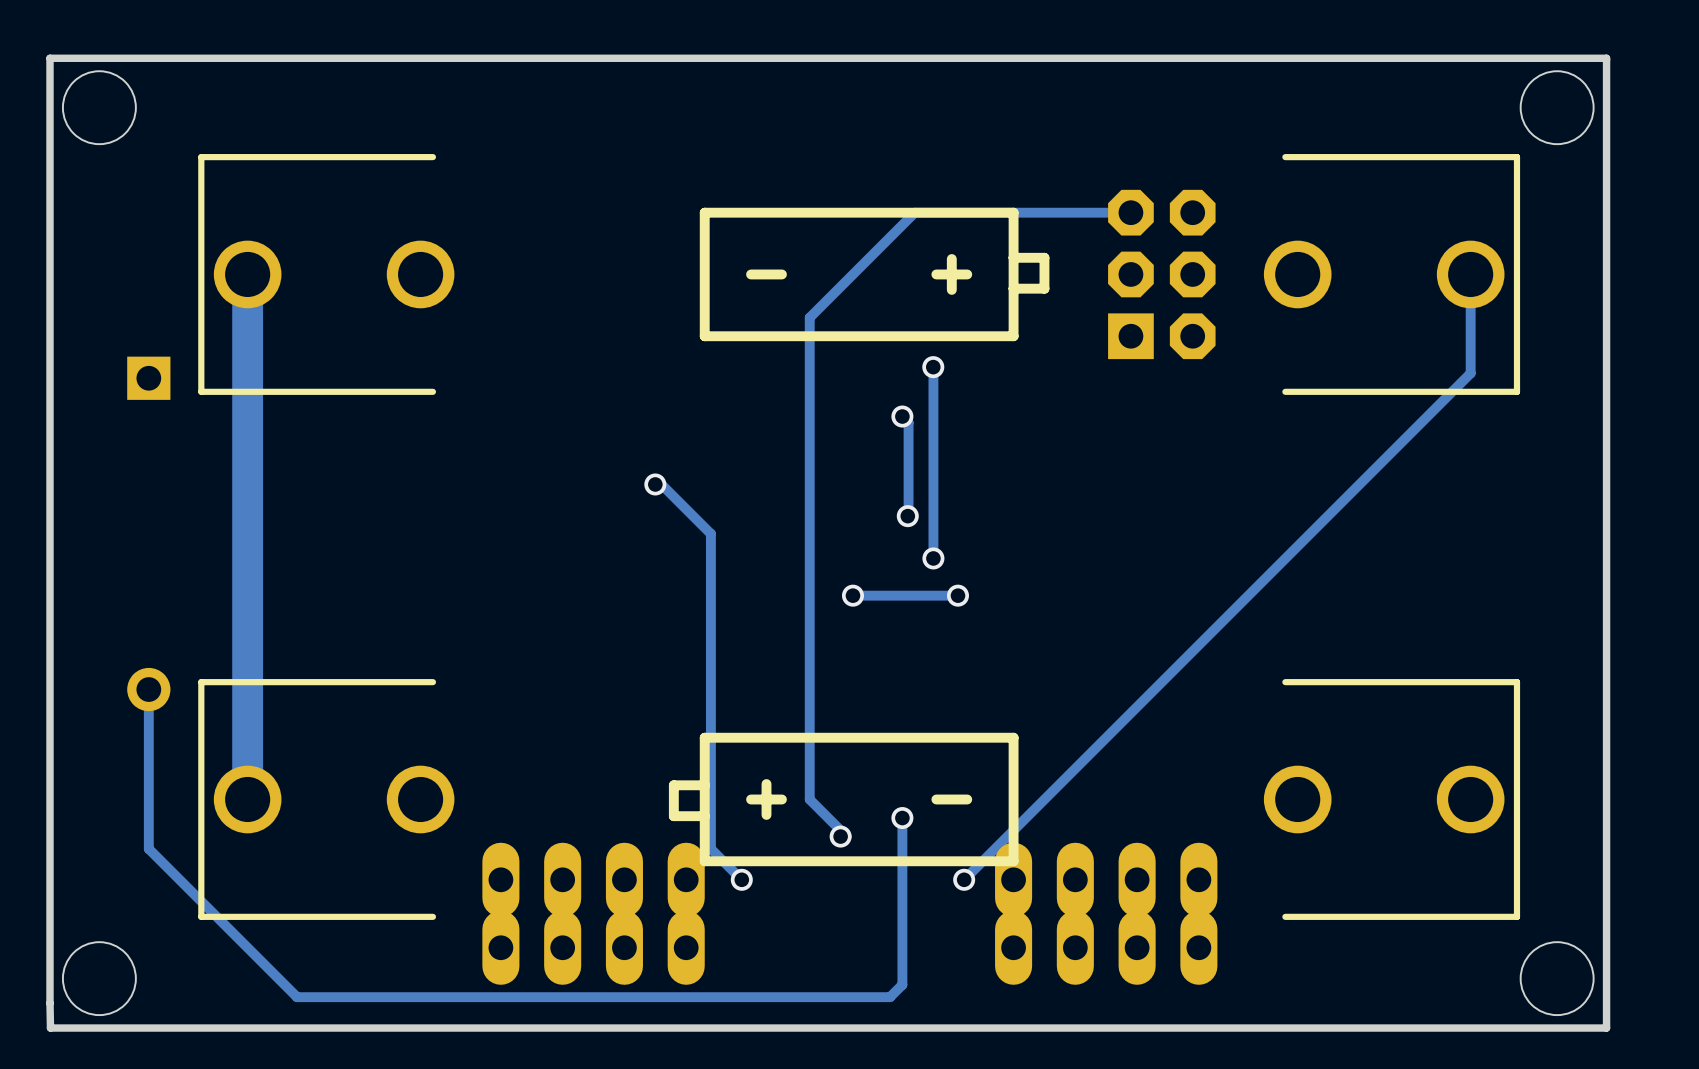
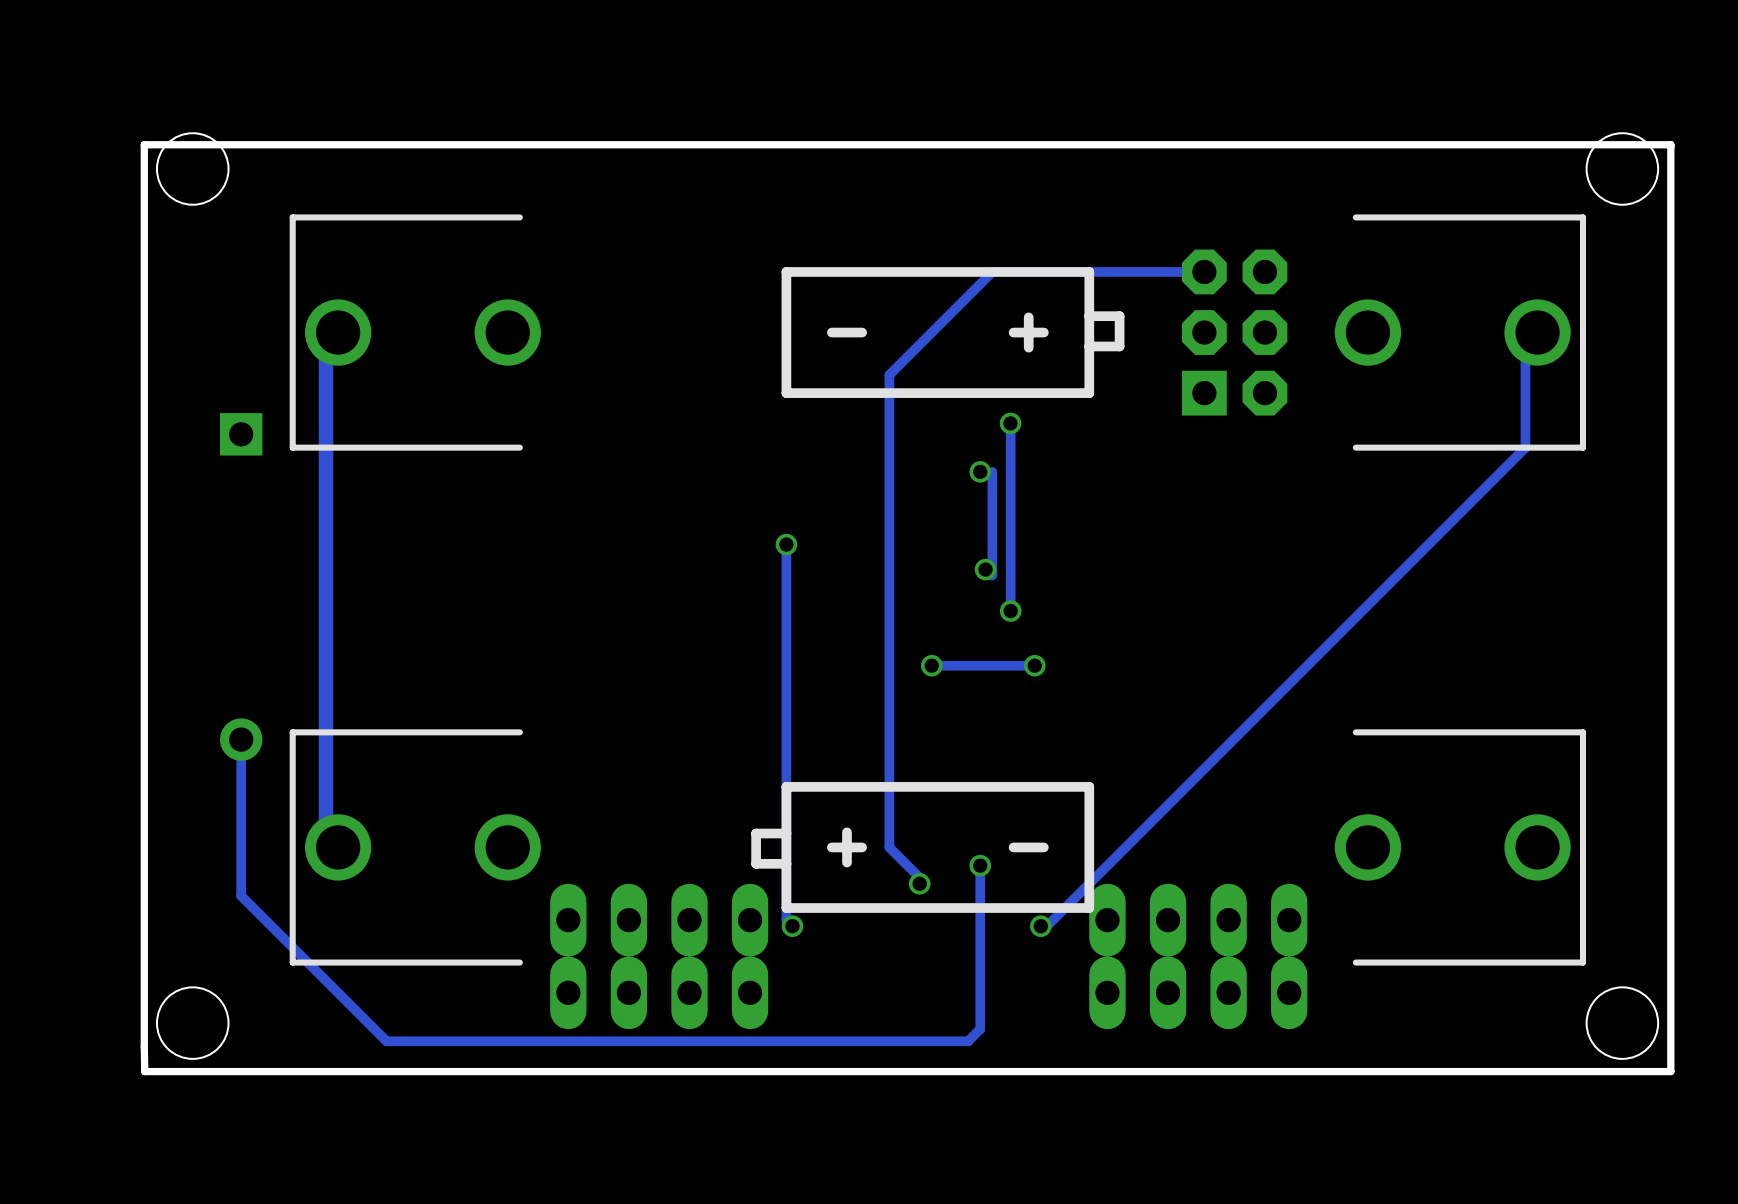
board edge: (1606, 82) (1606, 58) (49, 58) (49, 82) -> (1670, 144) (144, 144)
track: (247, 274) (247, 799) -> none
track: (1470, 274) (1470, 373) (964, 879) -> none
track: none -> (326, 356) (326, 859)
track: none -> (1525, 356) (1525, 447) (1040, 932)
track: (902, 416) (908, 422) (908, 521) (907, 516) -> none
track: none -> (992, 471) (991, 575)
track: (655, 484) (661, 484) (710, 533) (710, 848) (741, 879) -> none
via position: (655, 484) -> (786, 544)
track: none -> (786, 544) (786, 920) (792, 926)
via position: (852, 595) -> (931, 665)
track: (957, 595) (852, 595) -> (1034, 665) (931, 665)
via position: (957, 595) -> (1034, 665)
part position: (593, 879) -> (659, 920)
via position: (741, 879) -> (792, 926)
part position: (1106, 879) -> (1198, 920)
part position: (593, 947) -> (659, 992)
part position: (1106, 947) -> (1198, 992)

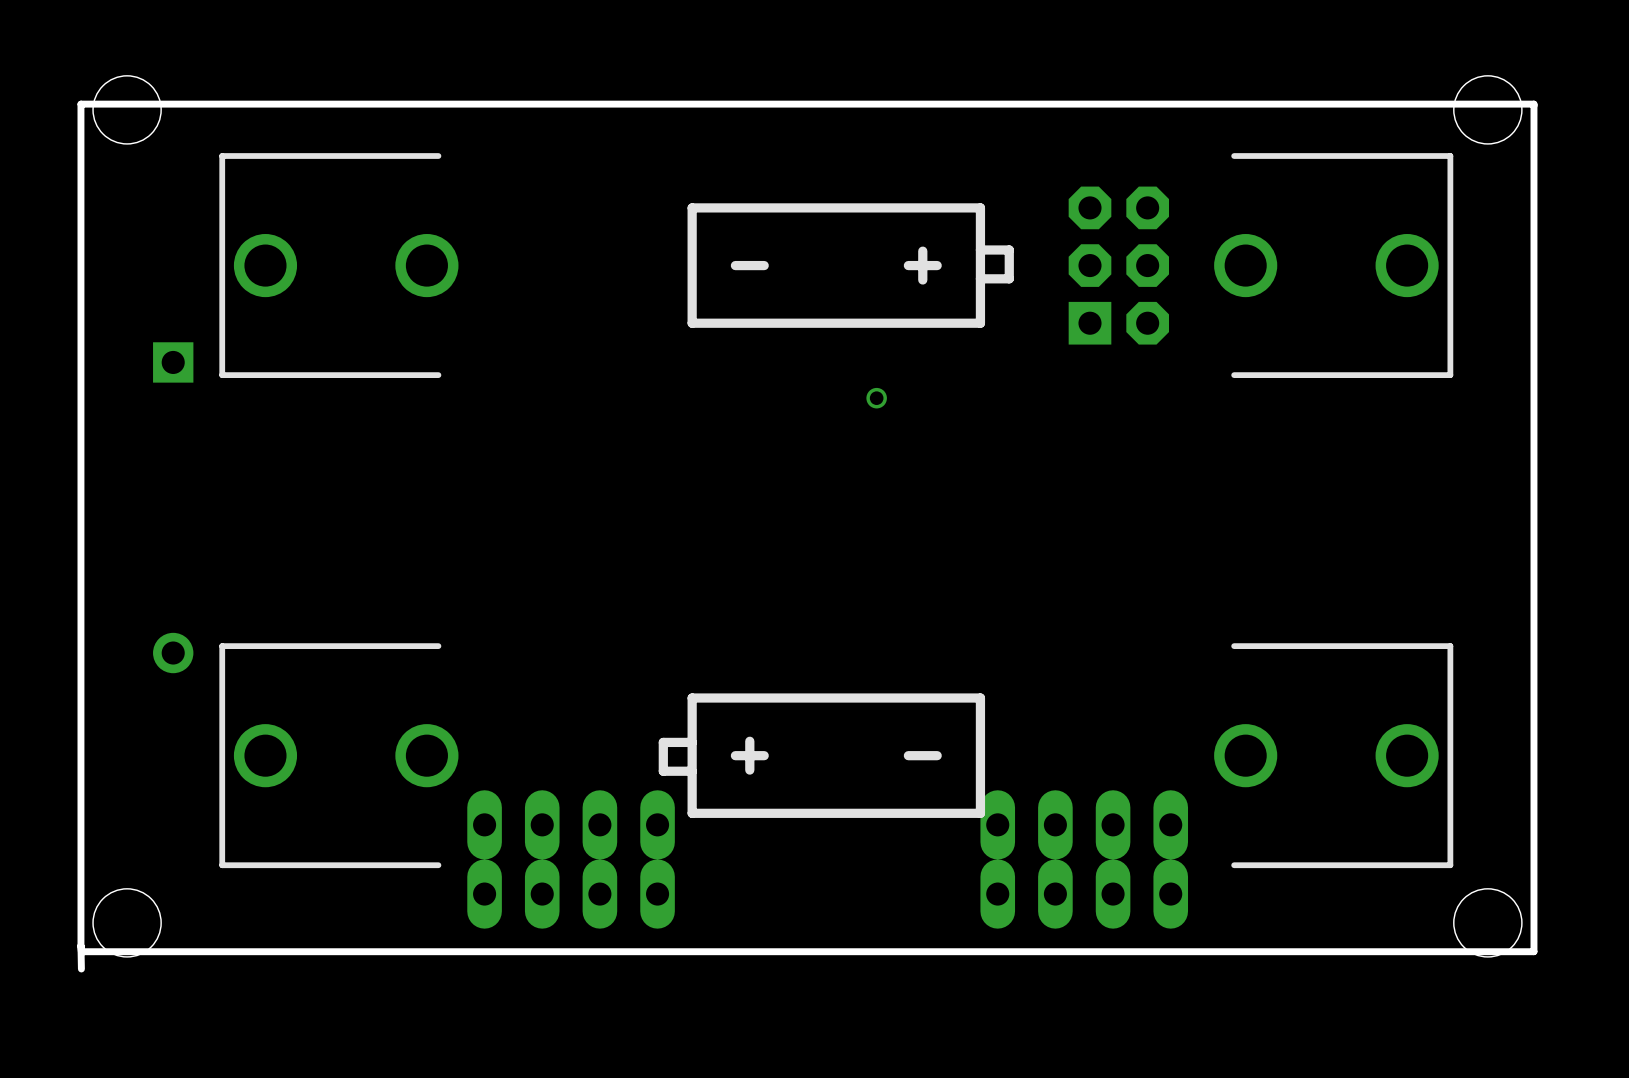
board edge: (1670, 162) (1670, 144) (144, 144) (144, 162) -> (1533, 104) (80, 104)
track: (1198, 271) (992, 271) (889, 374) (889, 847) (925, 883) -> none
track: (326, 356) (326, 859) -> none
track: (1525, 356) (1525, 447) (1040, 932) -> none
track: (1010, 423) (1010, 611) -> none
via: (1010, 423) -> none
track: (992, 471) (991, 575) -> none
track: (786, 544) (786, 920) (792, 926) -> none
via: (786, 544) -> none
via: (985, 569) -> none
via: (1010, 611) -> none
via: (931, 665) -> none
track: (1034, 665) (931, 665) -> none
via: (1034, 665) -> none
track: (241, 757) (241, 895) (386, 1041) (968, 1041) (980, 1029) (980, 865) -> none
via: (980, 865) -> none
via: (919, 883) -> none
via: (792, 926) -> none
via: (1040, 926) -> none
board edge: (1670, 1053) (1670, 1071) (144, 1071) (144, 1053) -> (1533, 951) (81, 951) (80, 945)

